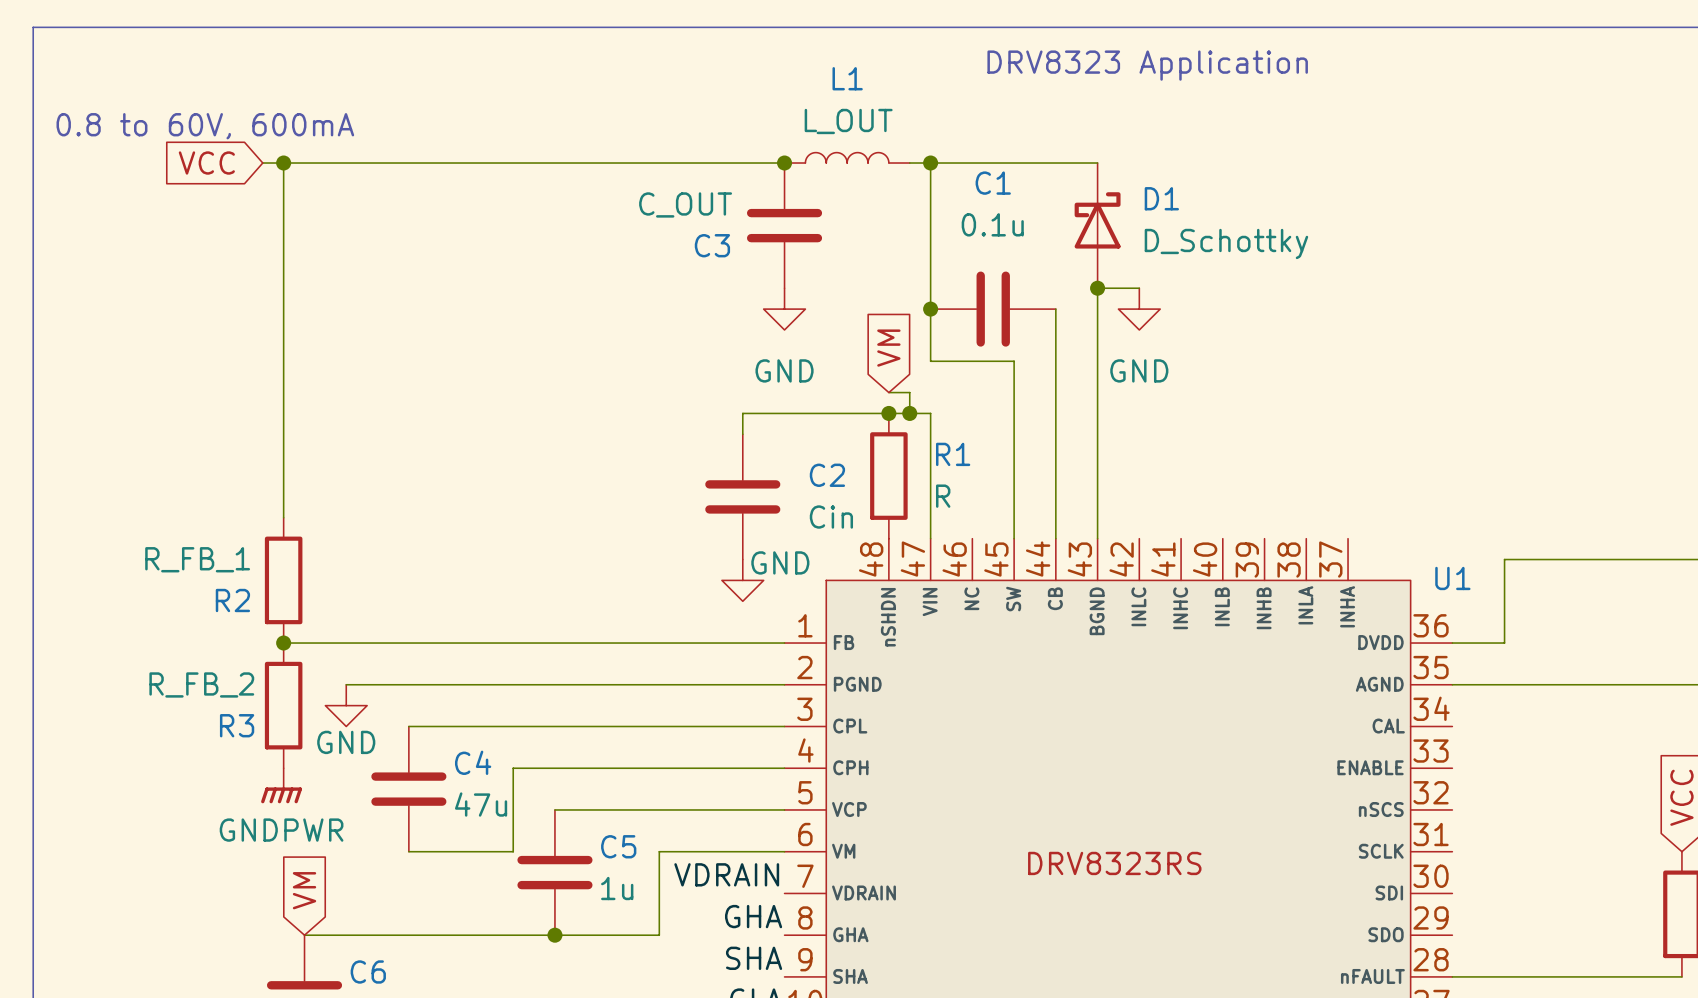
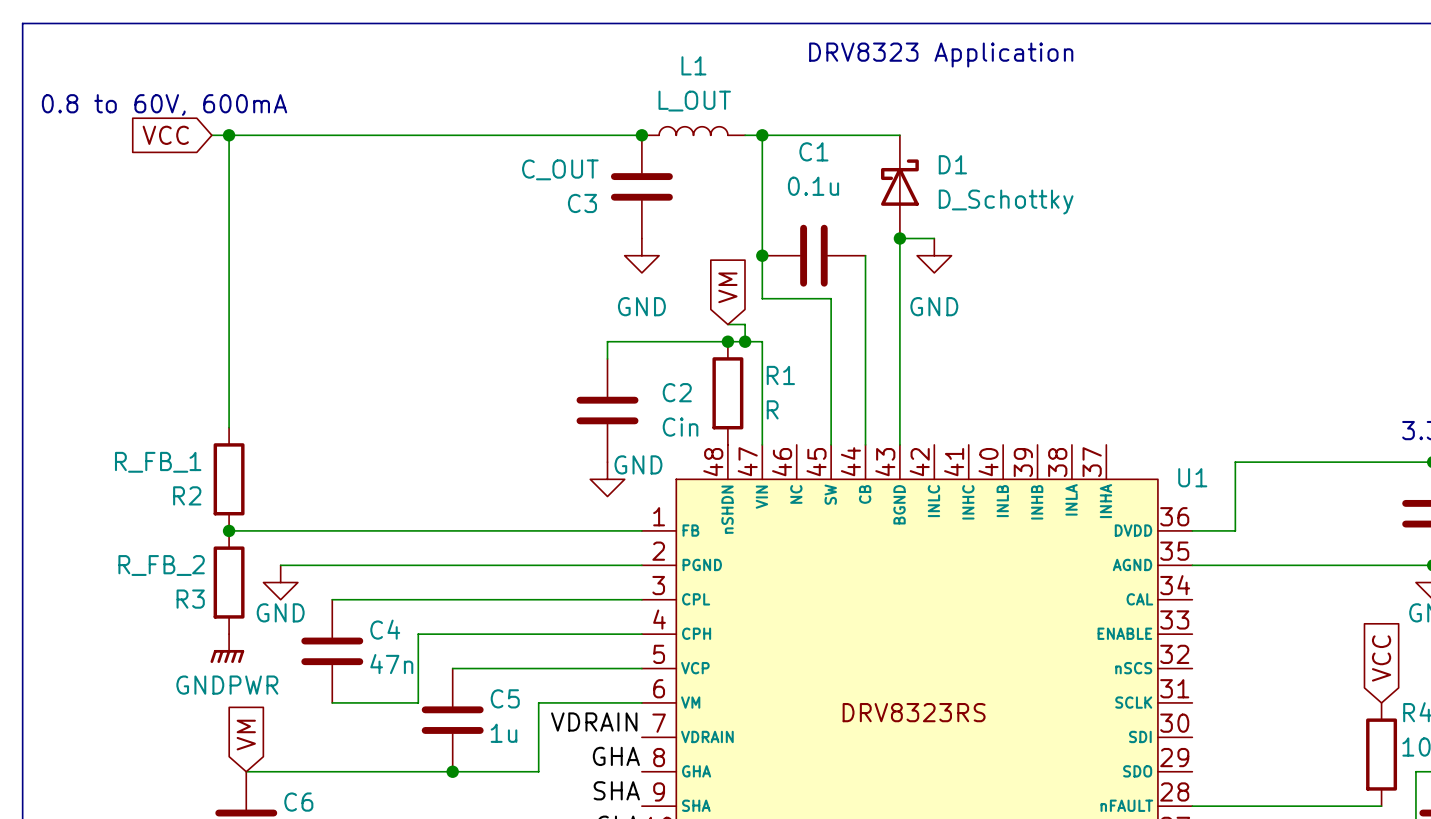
C4 value: 47u (481, 804) -> 47n (391, 664)

